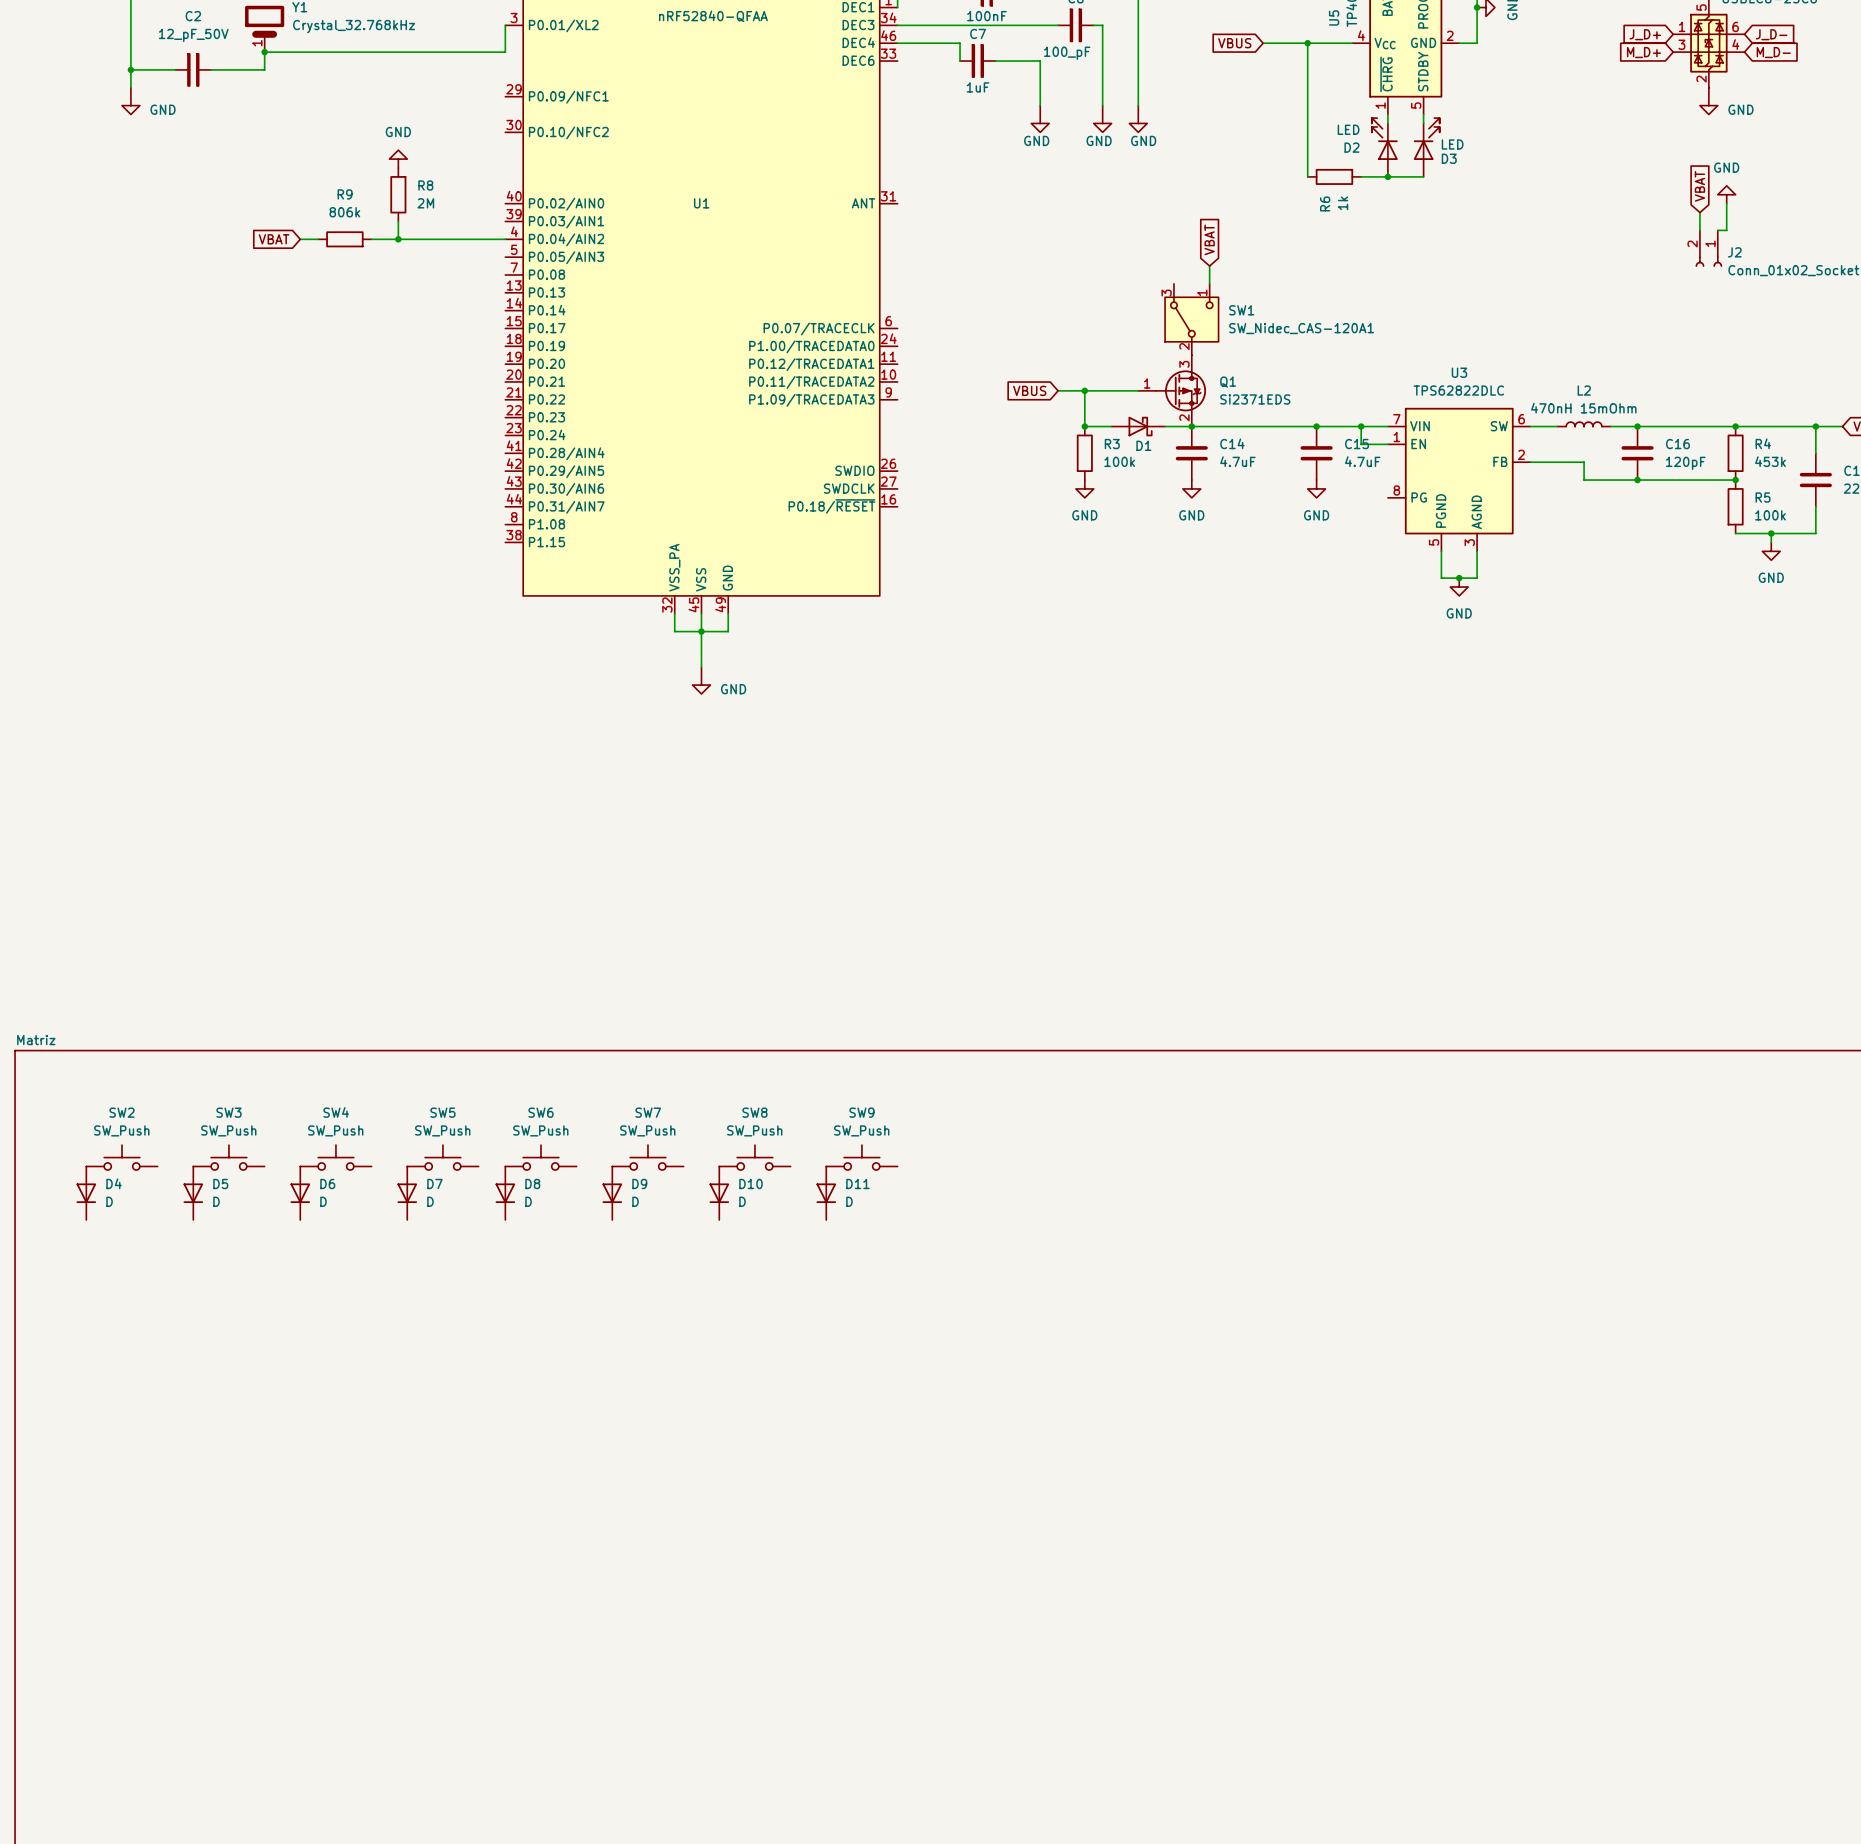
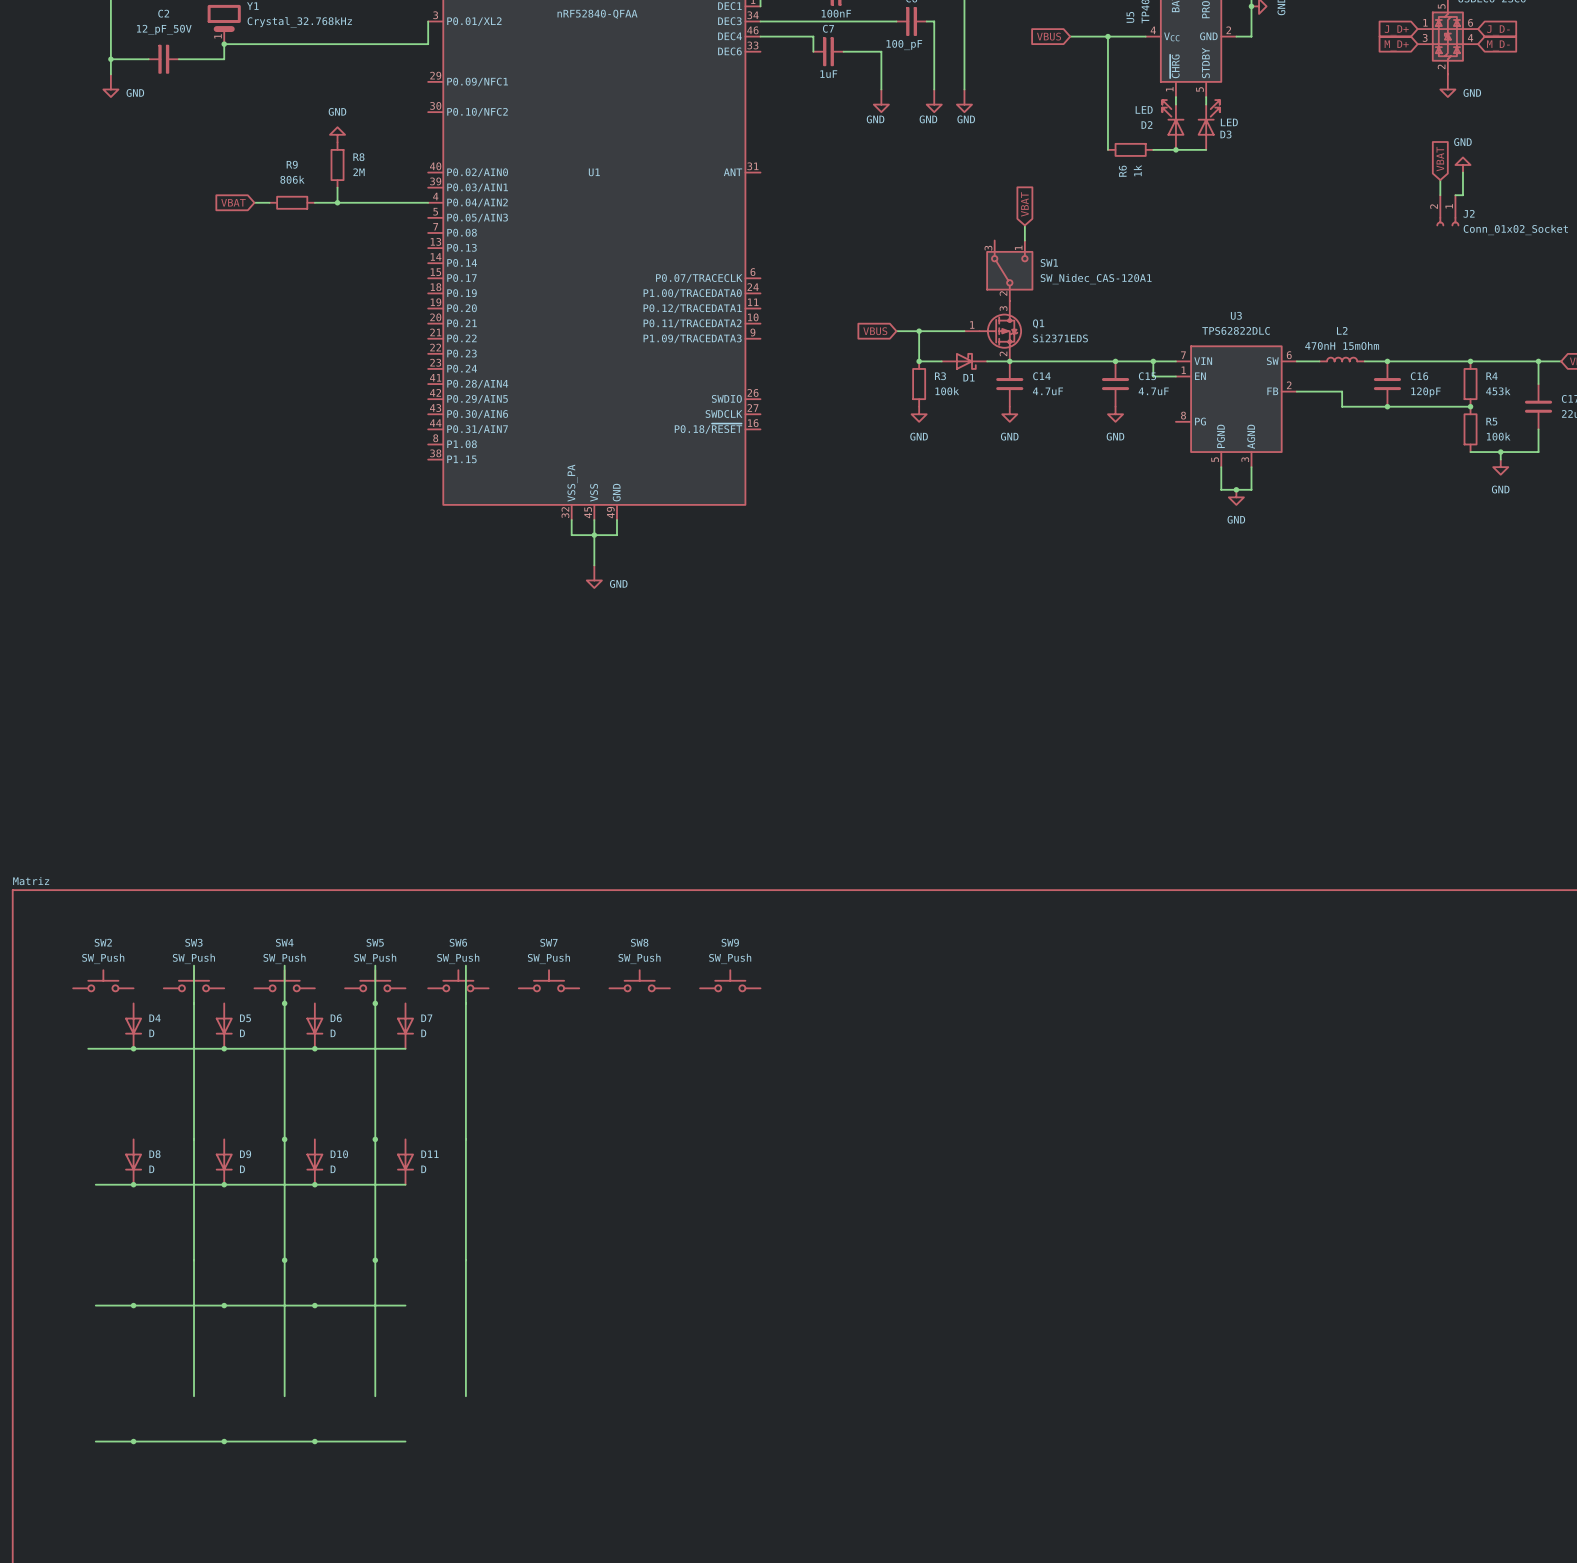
wire: none -> (194, 965) (194, 1396)
wire: none -> (284, 965) (284, 1396)
wire: none -> (375, 965) (375, 1396)
wire: none -> (465, 965) (465, 1396)
junction: none -> (284, 1003)
junction: none -> (375, 1003)
D4 position: (86, 1193) -> (133, 1026)
D5 position: (193, 1193) -> (224, 1026)
D6 position: (300, 1193) -> (314, 1026)
D7 position: (407, 1193) -> (405, 1026)
D8 position: (505, 1193) -> (133, 1162)
D9 position: (612, 1193) -> (224, 1162)
D10 position: (719, 1193) -> (314, 1162)
D11 position: (826, 1193) -> (405, 1162)
wire: none -> (88, 1048) (405, 1048)
junction: none -> (133, 1048)
junction: none -> (224, 1048)
junction: none -> (314, 1048)
junction: none -> (284, 1139)
junction: none -> (375, 1139)
wire: none -> (95, 1184) (405, 1184)
junction: none -> (133, 1184)
junction: none -> (224, 1184)
junction: none -> (314, 1184)
junction: none -> (284, 1260)
junction: none -> (375, 1260)
wire: none -> (95, 1305) (405, 1305)
junction: none -> (133, 1305)
junction: none -> (224, 1305)
junction: none -> (314, 1305)
wire: none -> (95, 1441) (405, 1441)
junction: none -> (133, 1441)
junction: none -> (224, 1441)
junction: none -> (314, 1441)

